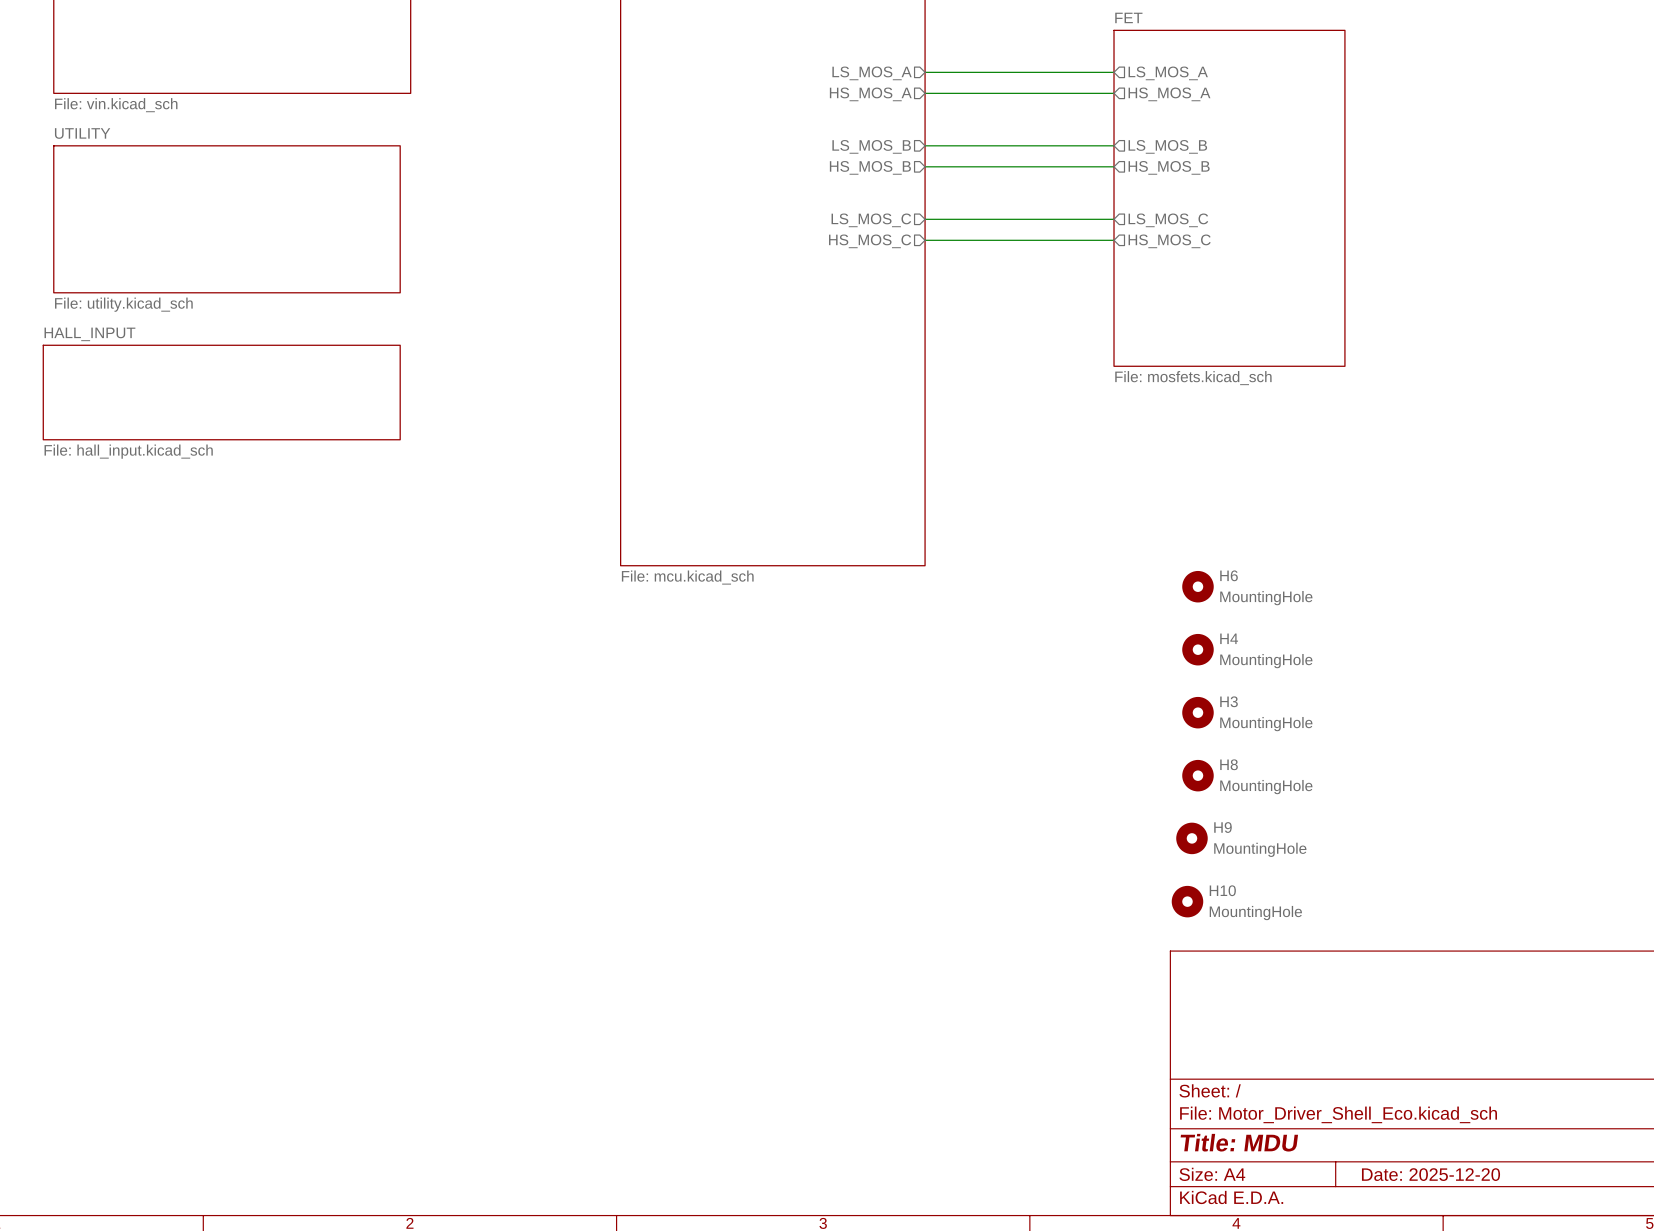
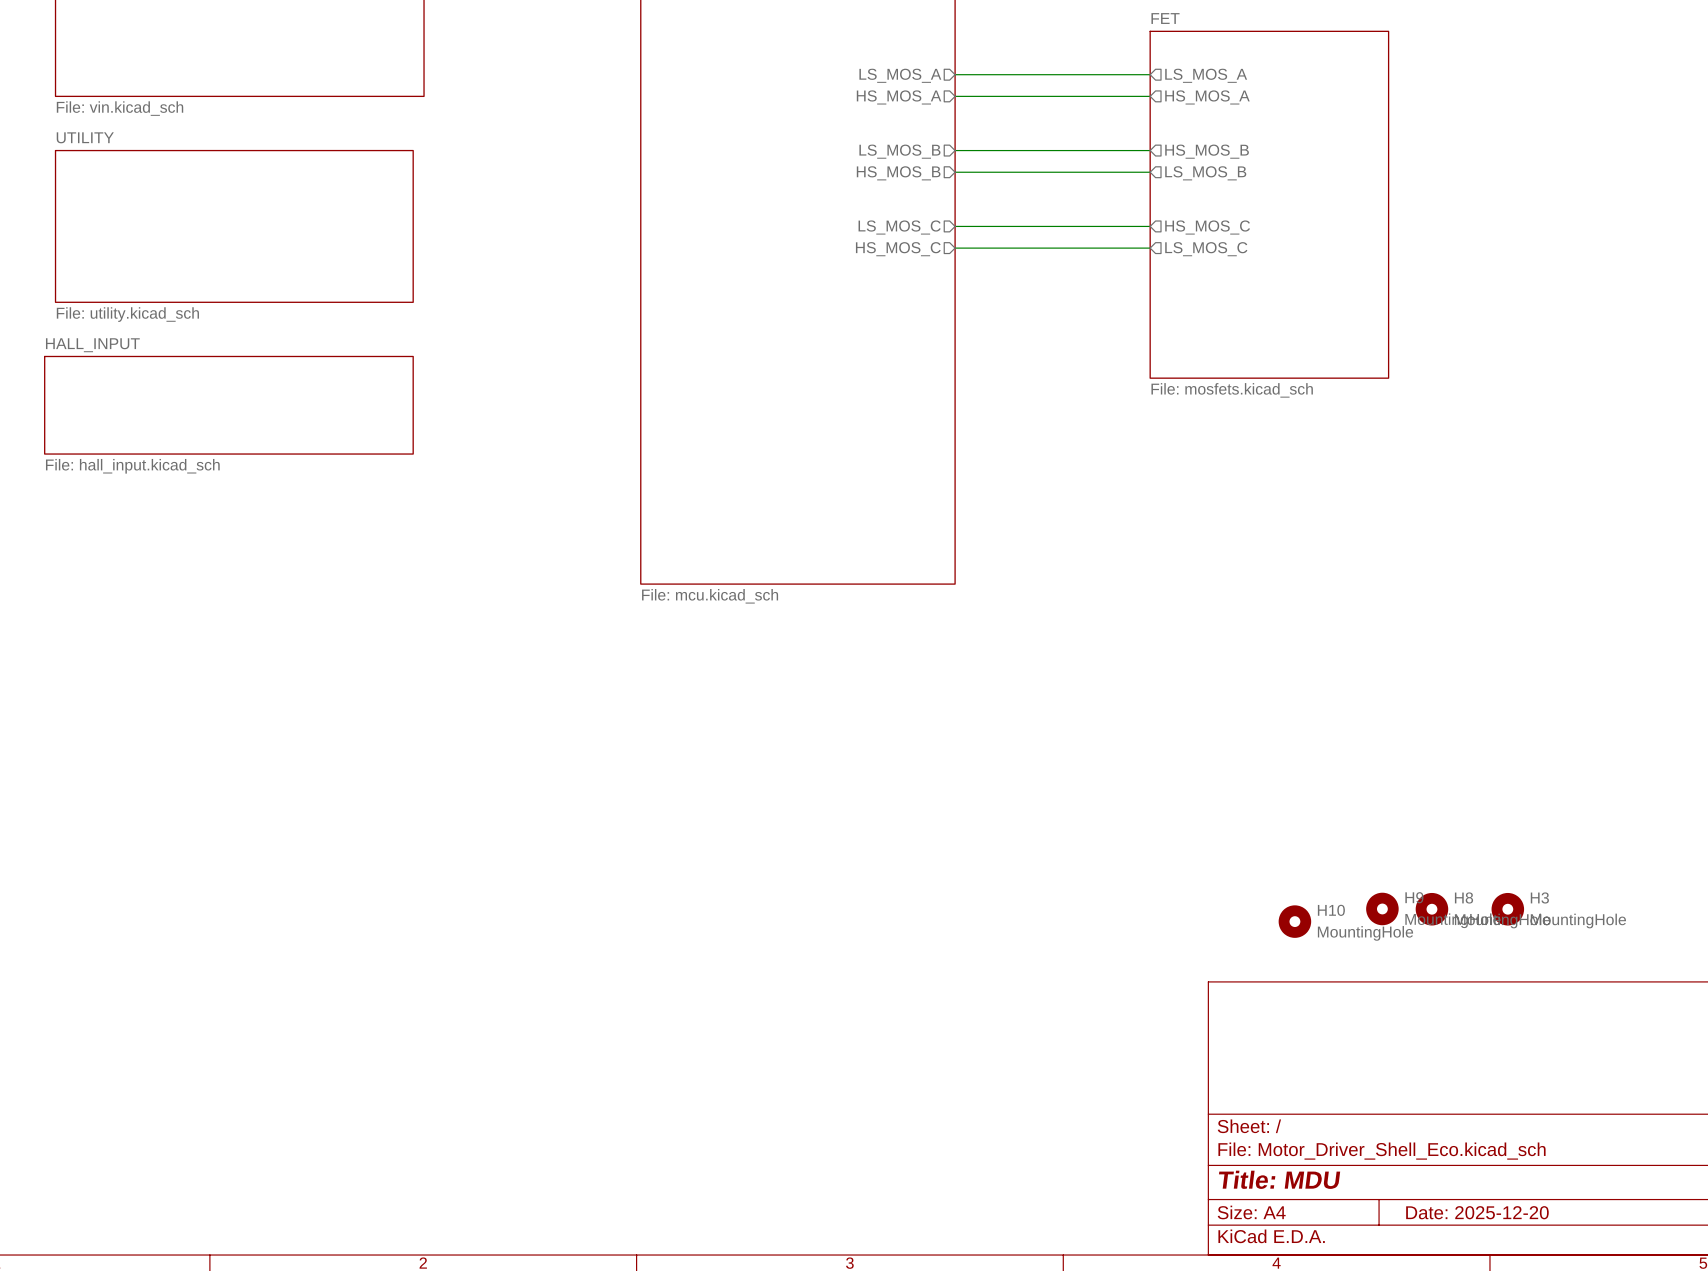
sheet pin: LS_MOS_B (1167, 146) -> HS_MOS_B (1207, 151)
sheet pin: HS_MOS_B (1169, 167) -> LS_MOS_B (1205, 173)
sheet pin: LS_MOS_C (1168, 220) -> HS_MOS_C (1207, 227)
sheet pin: HS_MOS_C (1169, 241) -> LS_MOS_C (1206, 249)
H6: MountingHole (1197, 586) -> none
H4: MountingHole (1197, 649) -> none
H3 position: (1197, 712) -> (1507, 909)
H8 position: (1197, 775) -> (1431, 909)
H9 position: (1191, 838) -> (1382, 908)
H10 position: (1187, 901) -> (1294, 921)

